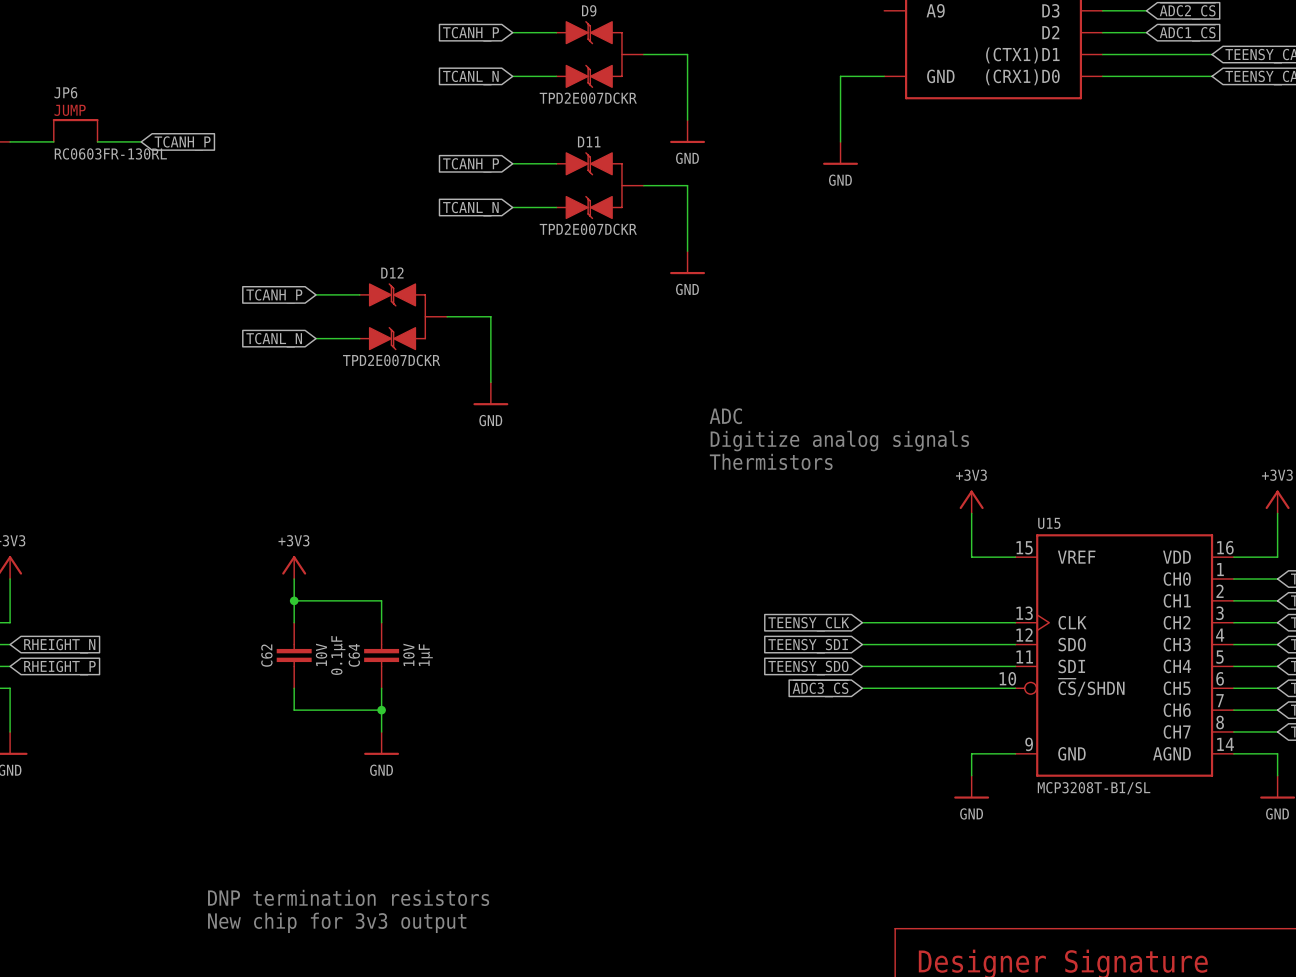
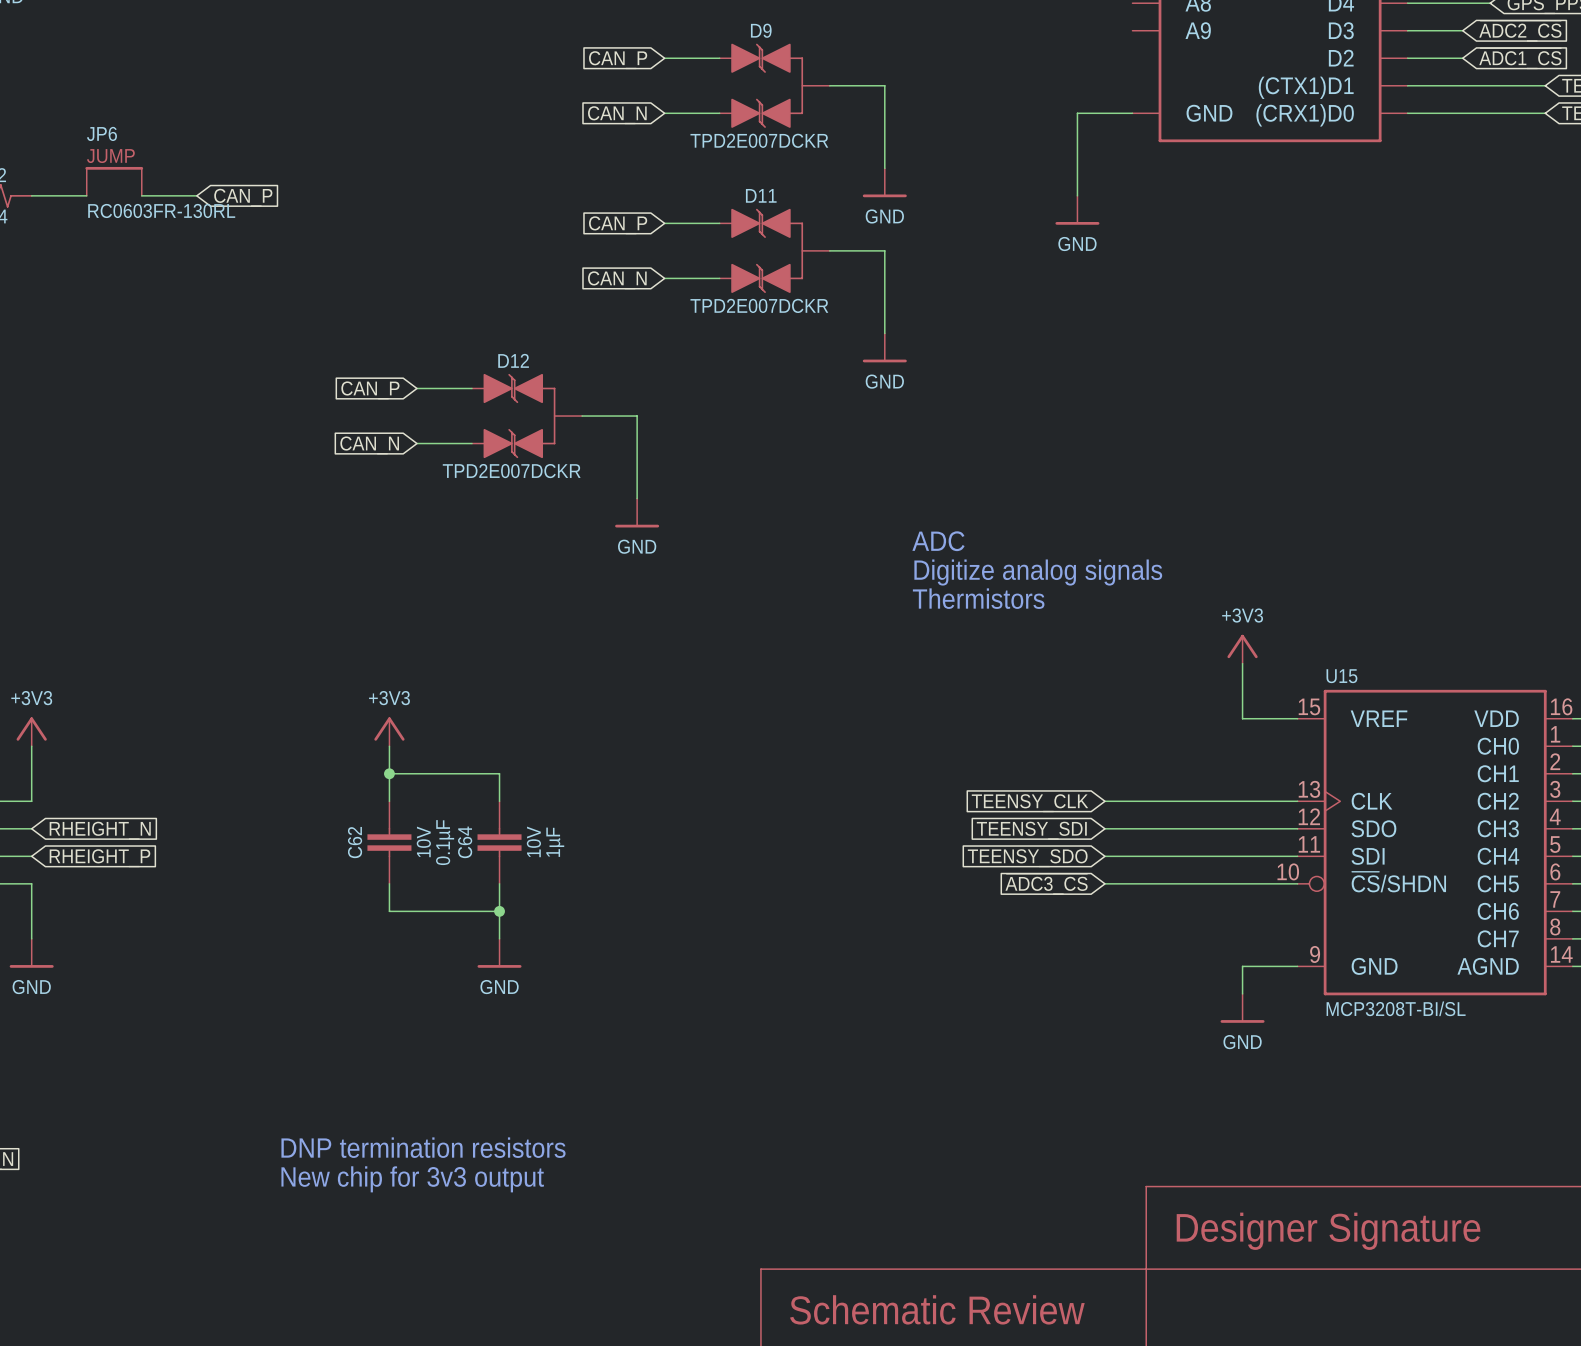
global label: TCANH_P (471, 34) -> CAN_P (618, 60)
global label: TCANL_N (470, 78) -> CAN_N (617, 115)
global label: TCANH_P (182, 143) -> CAN_P (243, 197)
global label: TCANH_P (471, 165) -> CAN_P (618, 225)
global label: TCANL_N (470, 209) -> CAN_N (617, 280)
global label: TCANH_P (274, 296) -> CAN_P (370, 390)
global label: TCANL_N (274, 340) -> CAN_N (369, 445)

